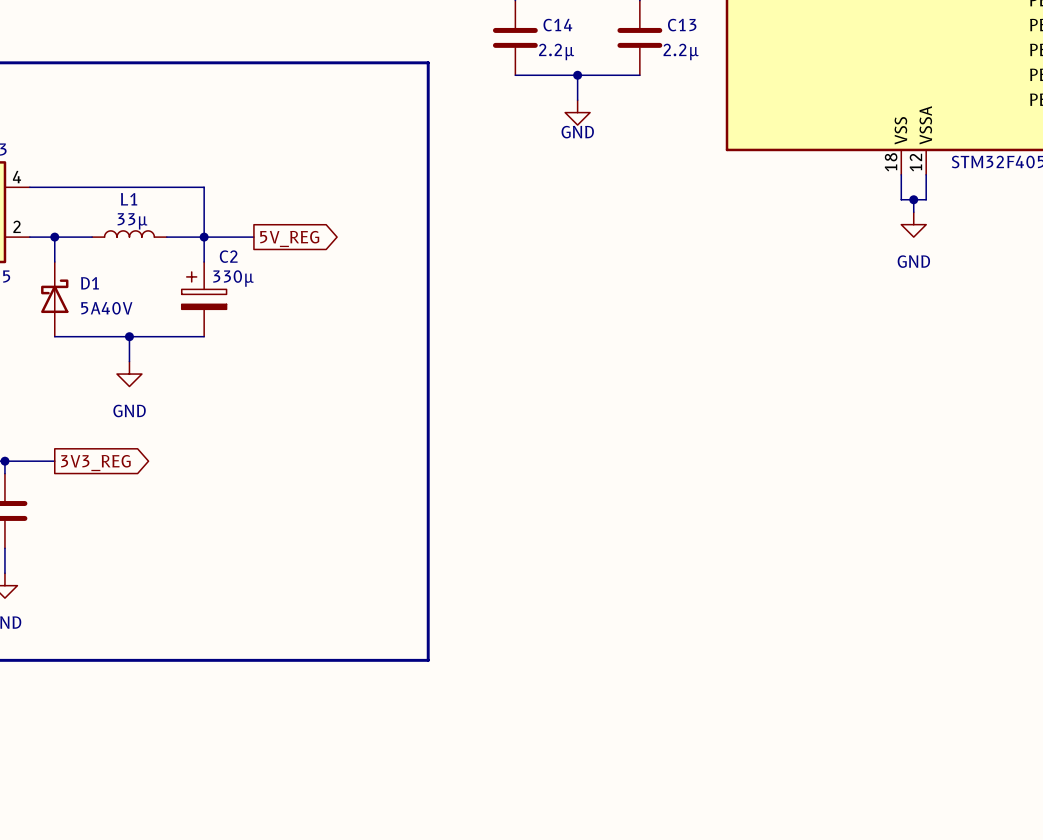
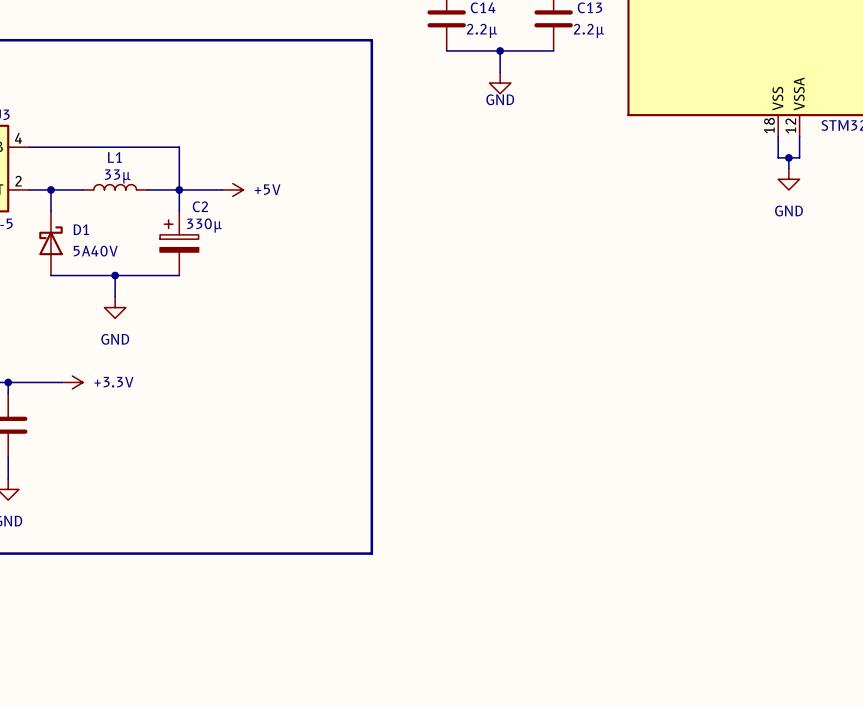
power symbol: none -> +5V (232, 189)
global label: 5V_REG (289, 238) -> none
wire: none -> (50, 382) (61, 382)
power symbol: none -> +3.3V (72, 382)
global label: 3V3_REG (95, 463) -> none

